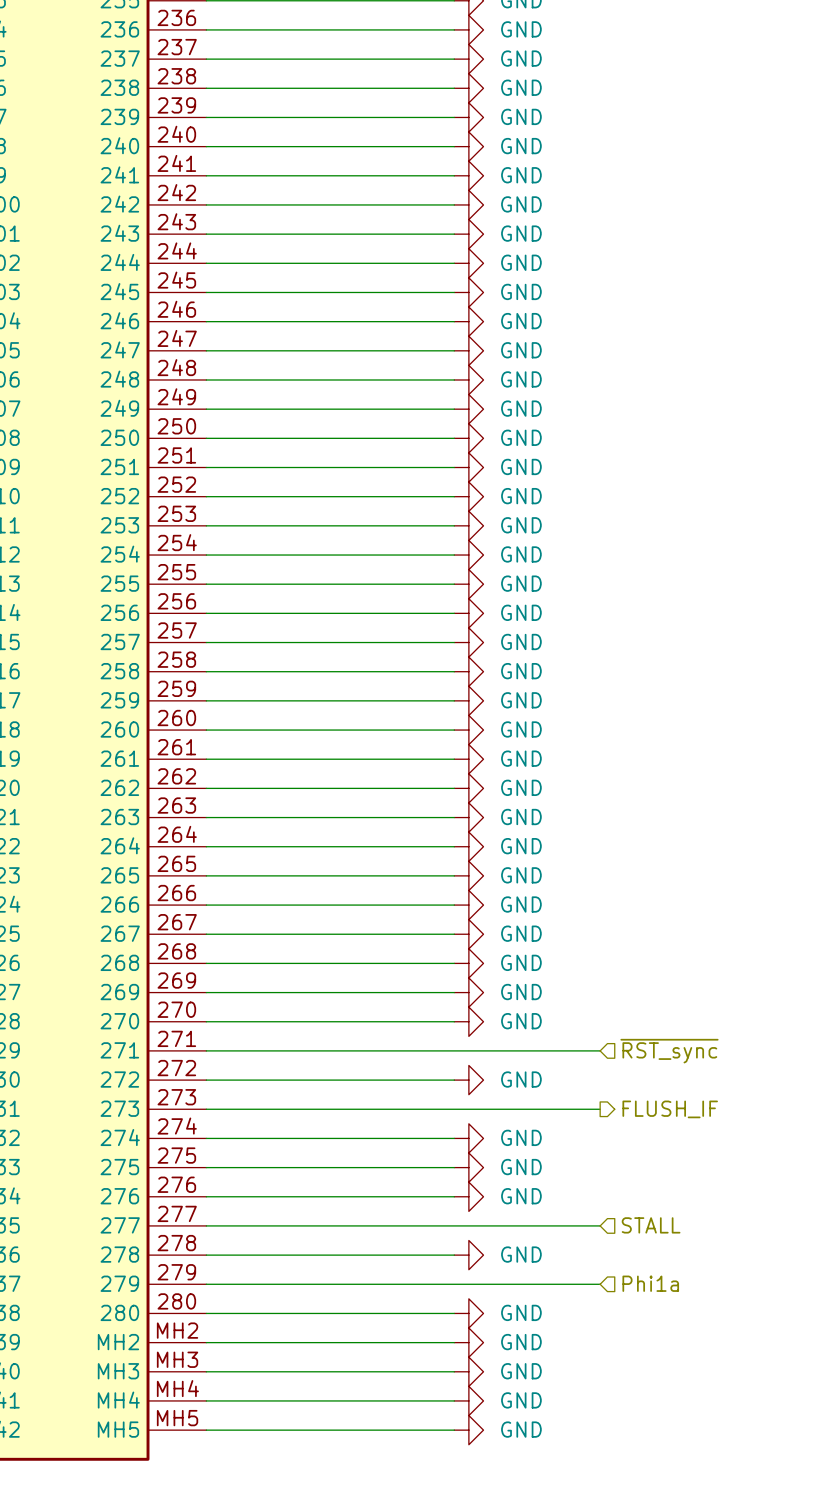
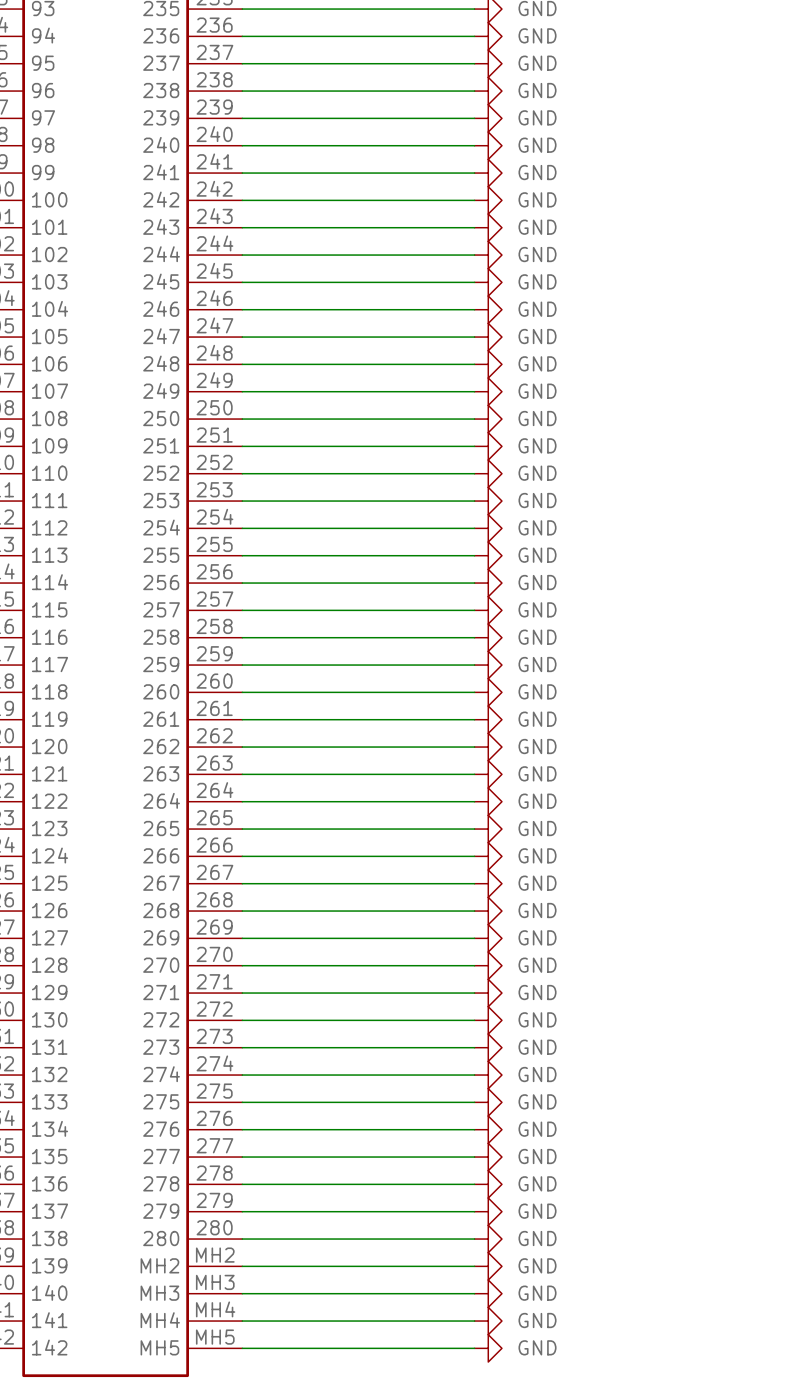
wire: (454, 1050) (600, 1050) -> none
power symbol: none -> GND (488, 993)
hierarchical label: ~{RST_sync} (669, 1051) -> none
wire: (454, 1109) (600, 1109) -> none
power symbol: none -> GND (488, 1047)
hierarchical label: FLUSH_IF (670, 1109) -> none
wire: (454, 1225) (600, 1225) -> none
power symbol: none -> GND (488, 1157)
hierarchical label: STALL (651, 1225) -> none
hierarchical label: Phi1a (650, 1283) -> none
wire: (454, 1284) (600, 1284) -> none
power symbol: none -> GND (488, 1211)

